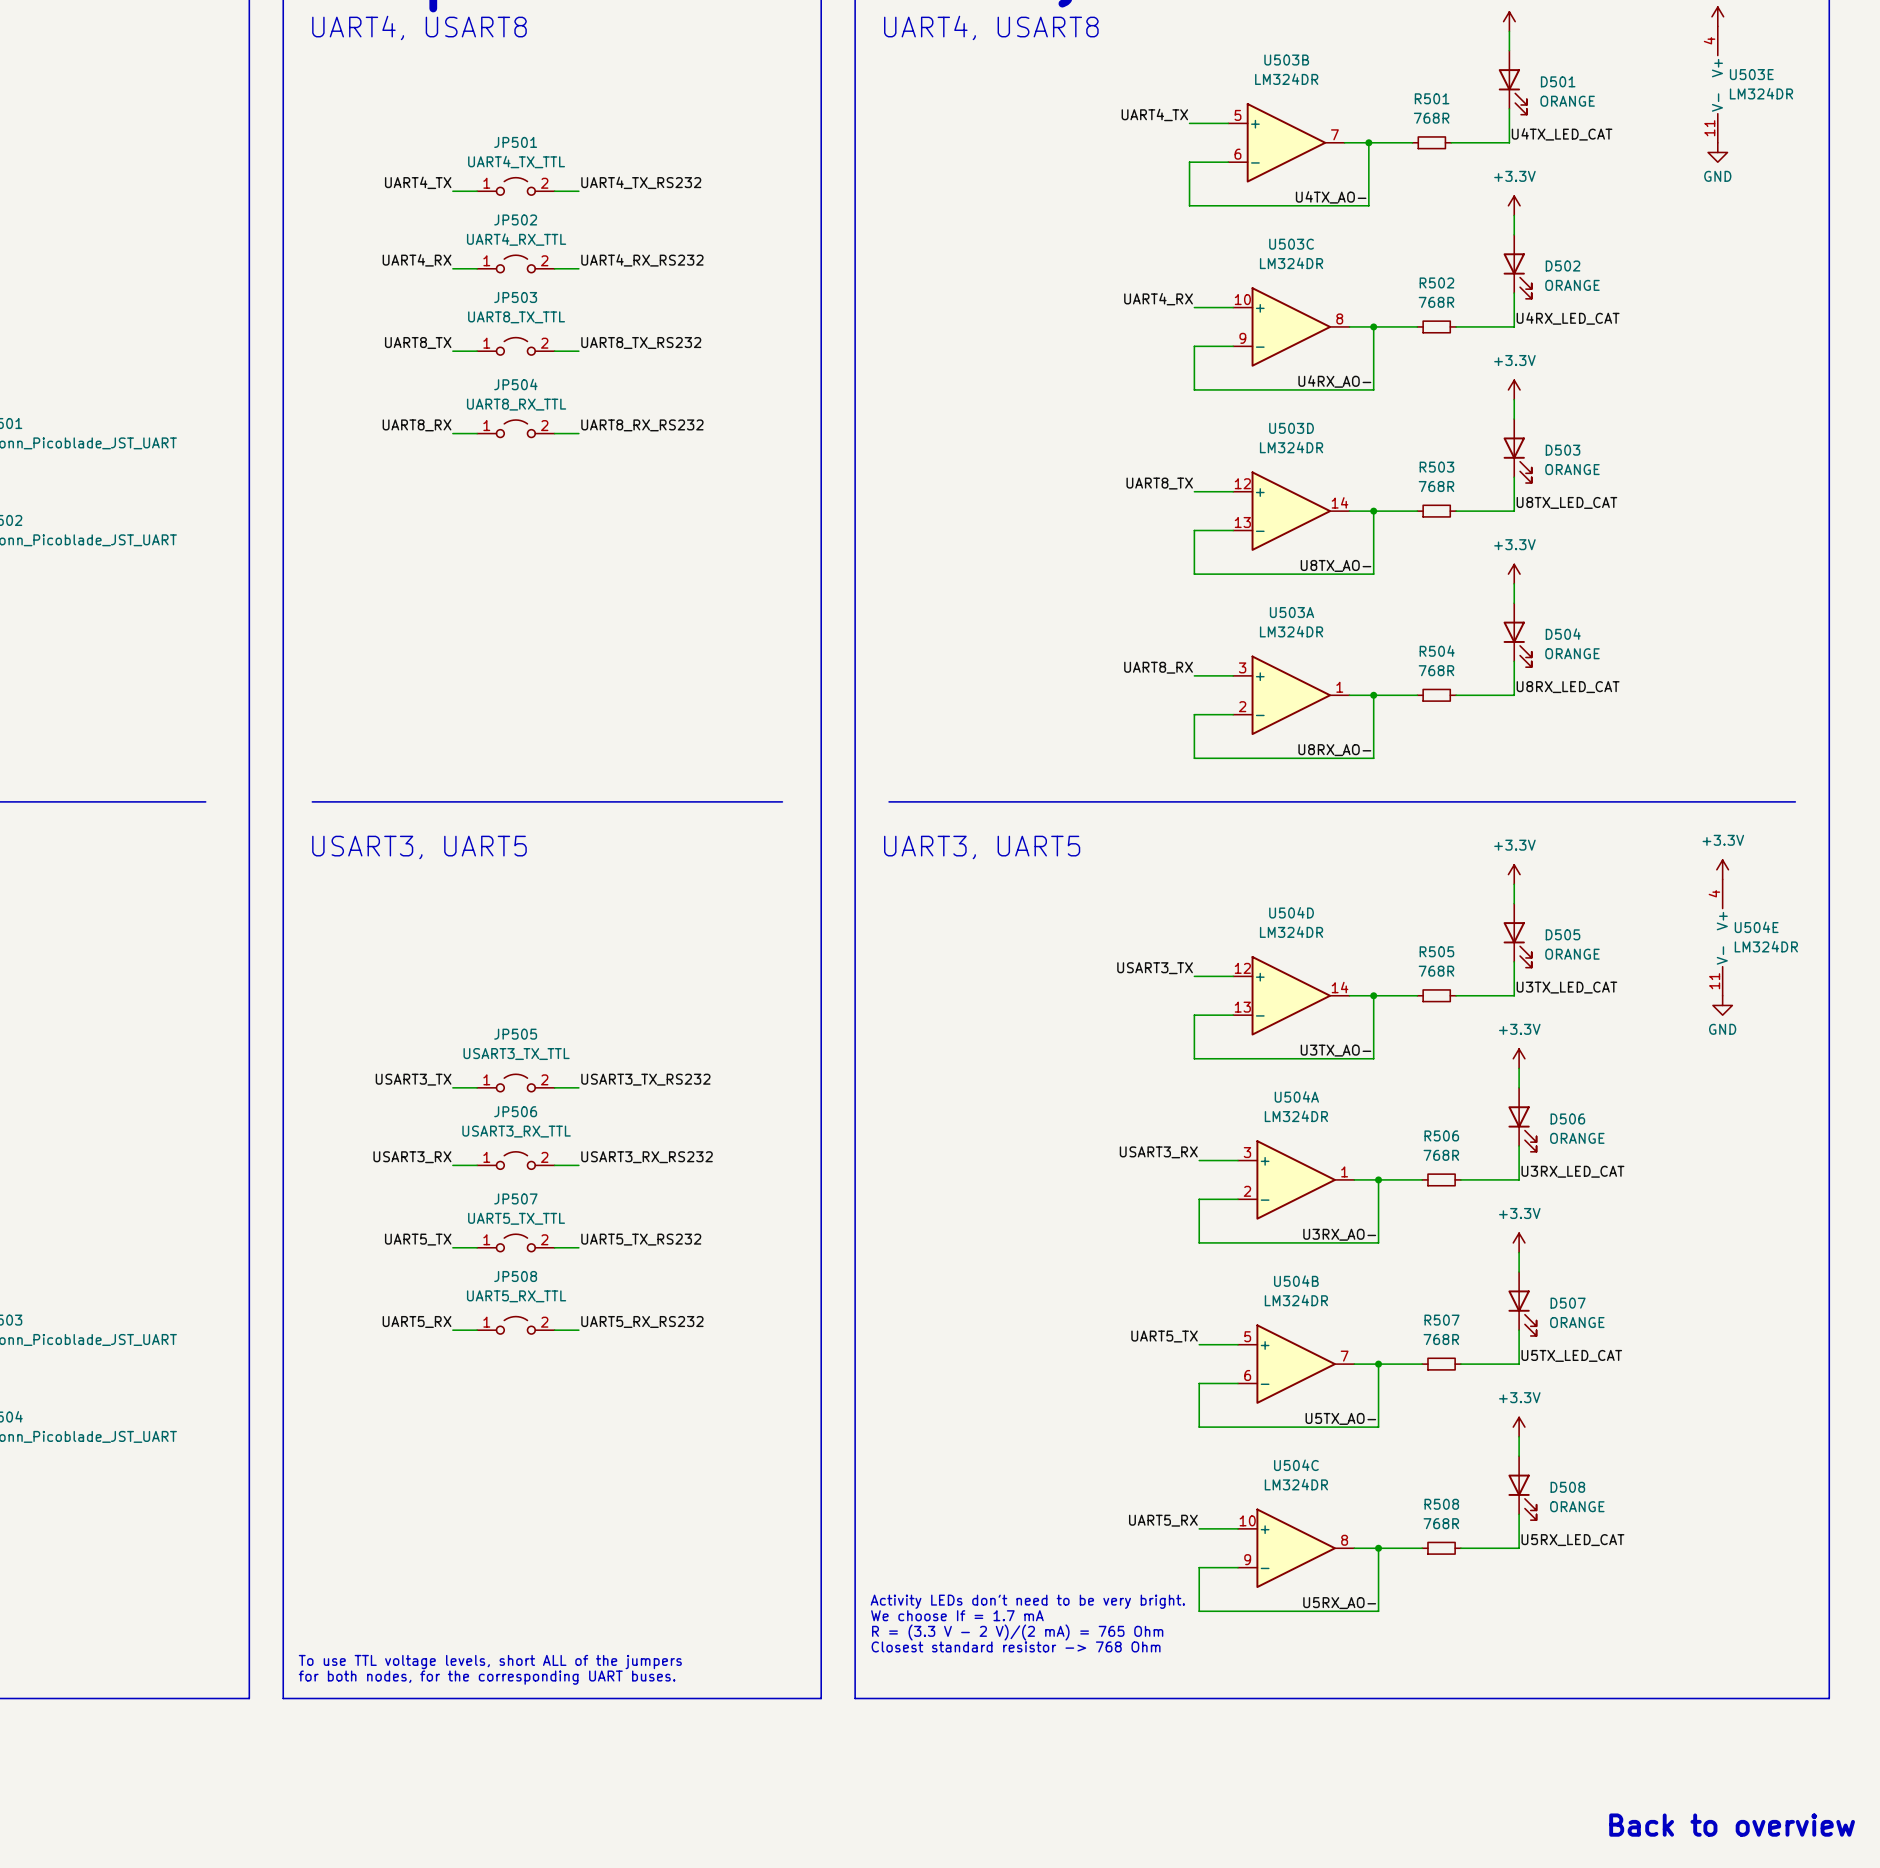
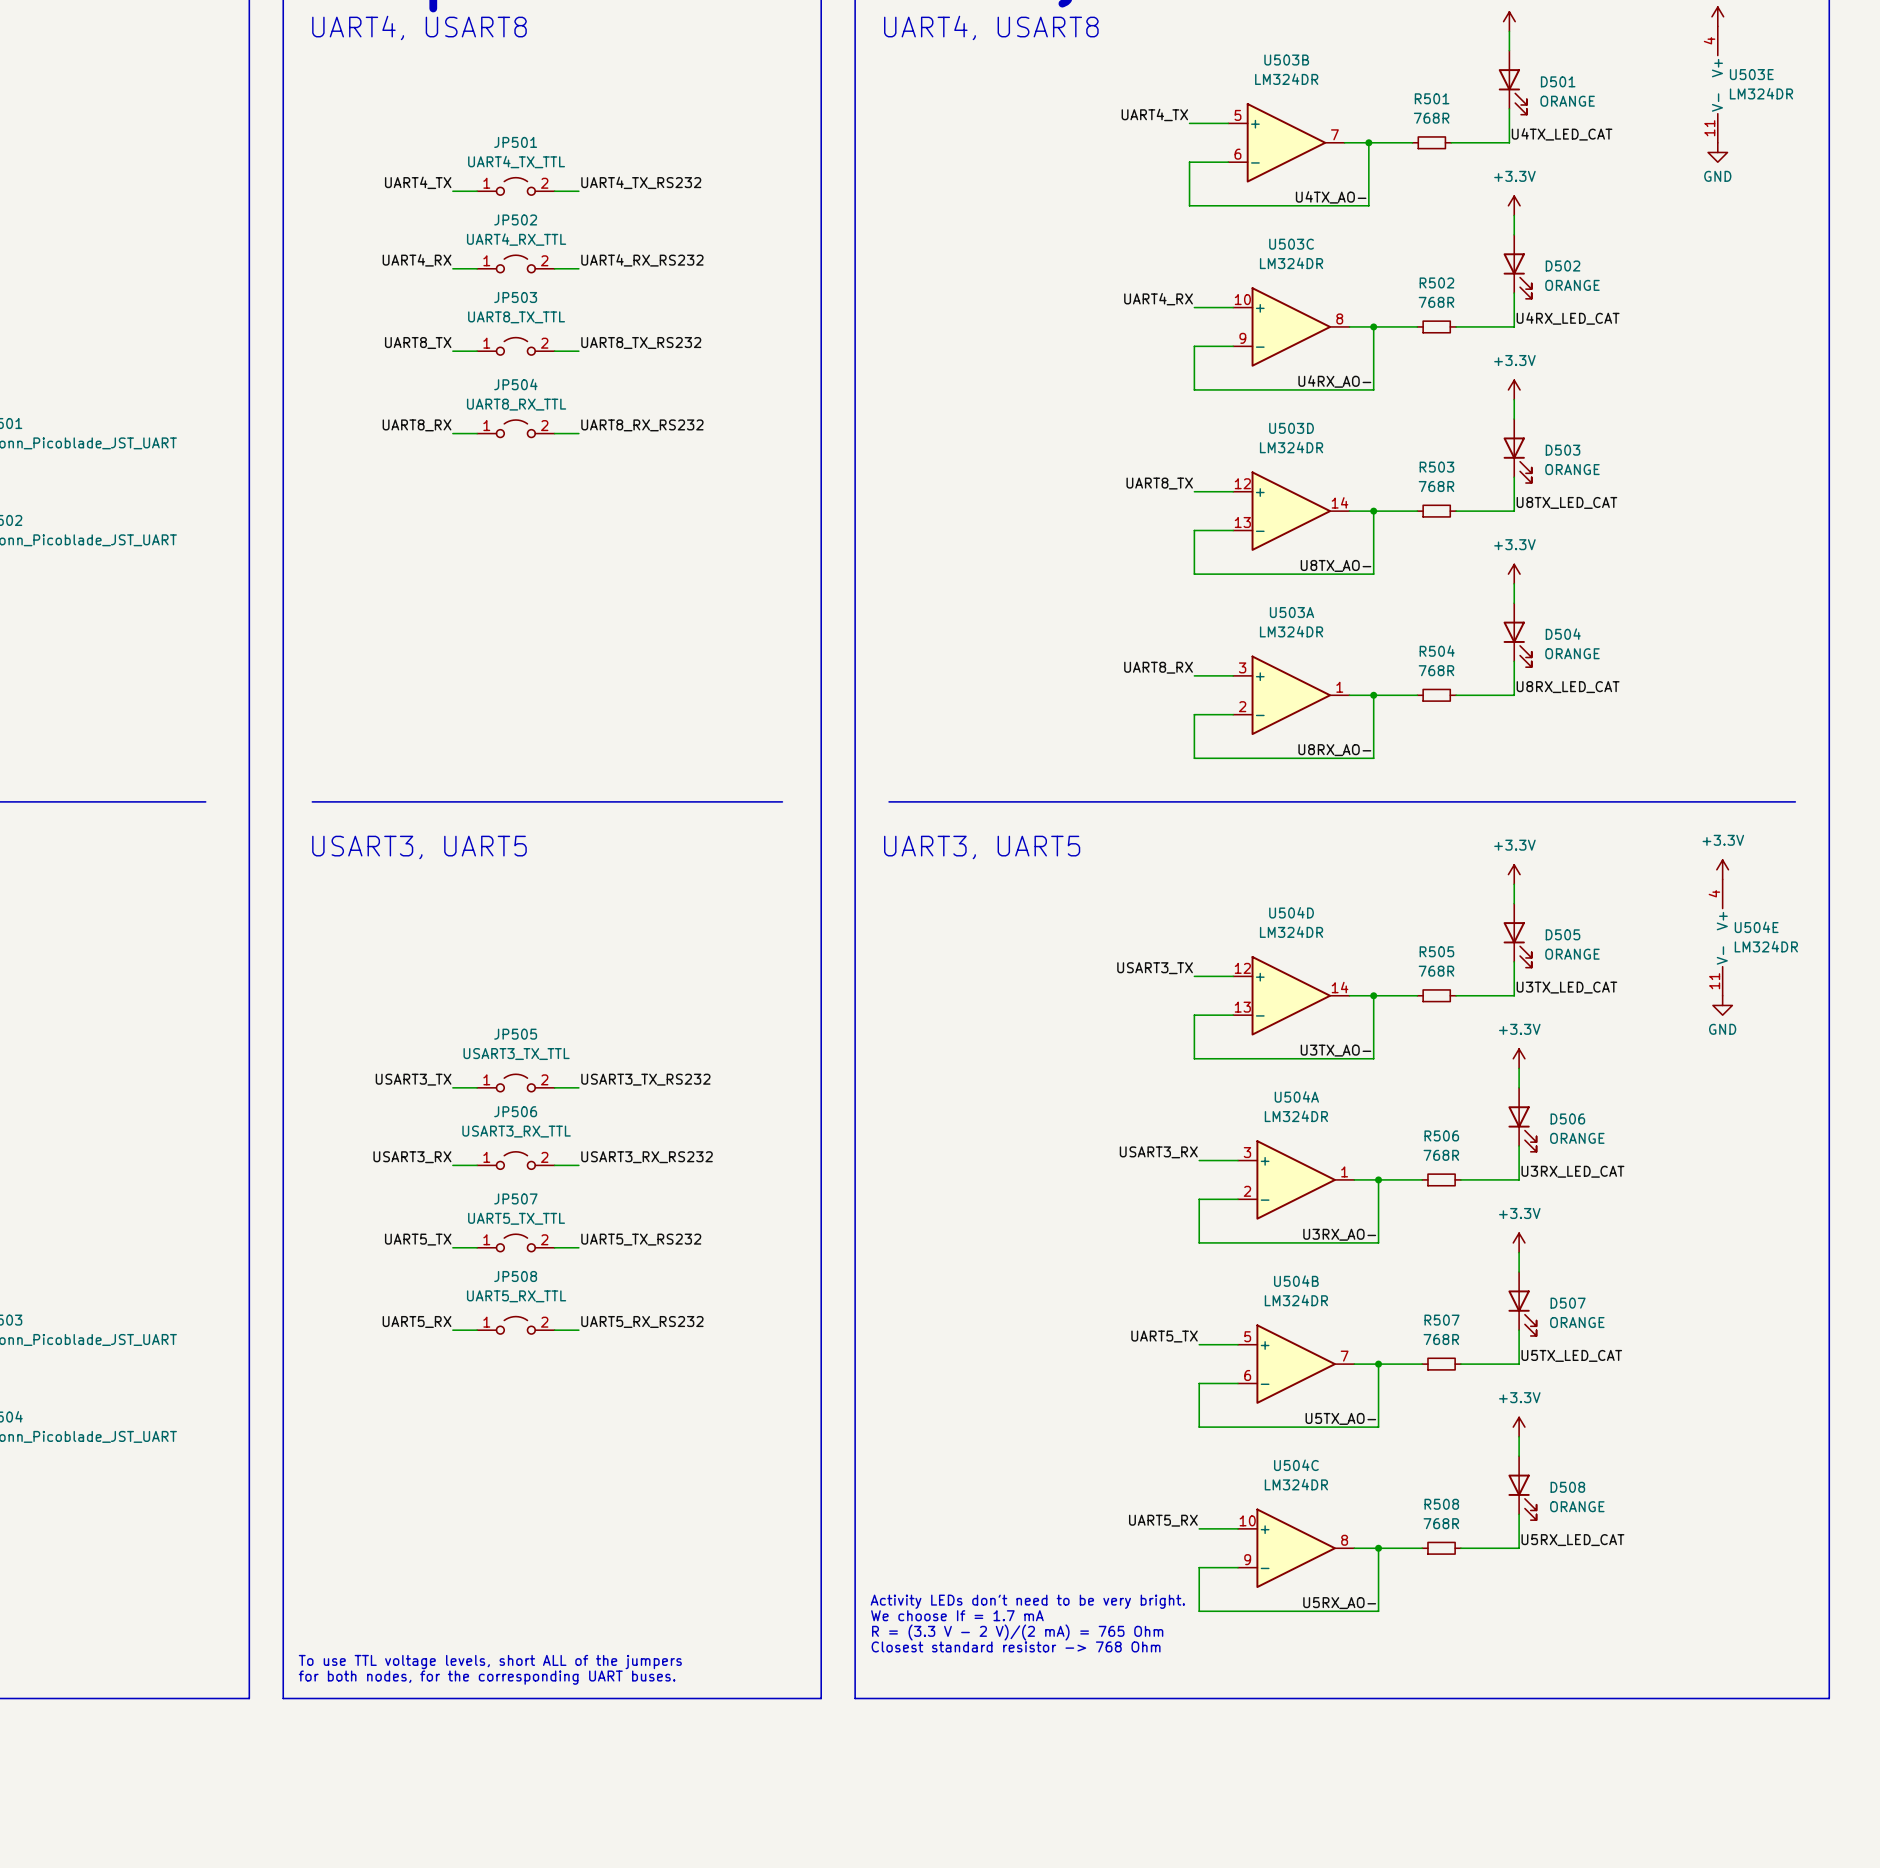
text: Back to overview (1732, 1825) -> none

